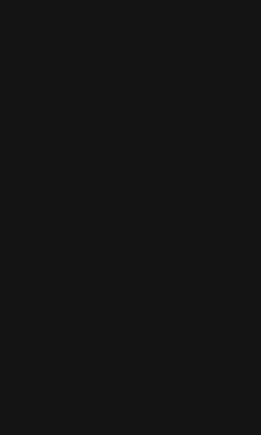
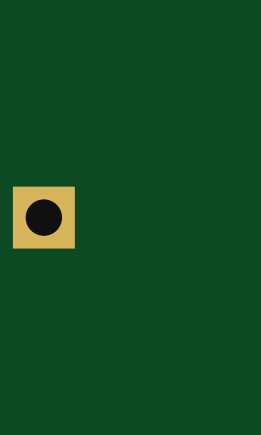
part: none -> (43, 217)

